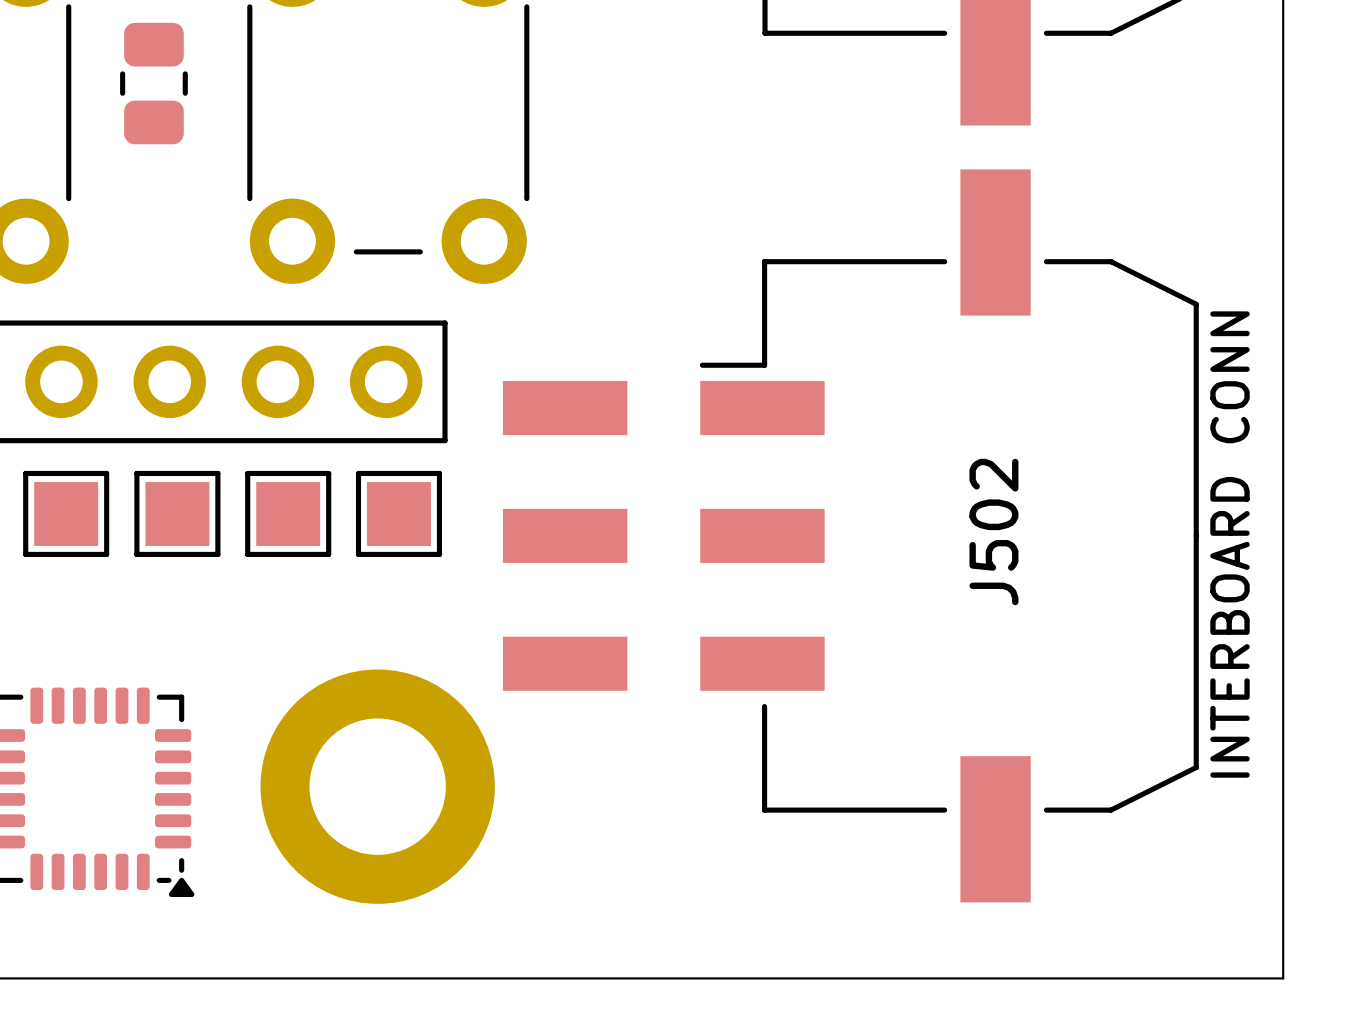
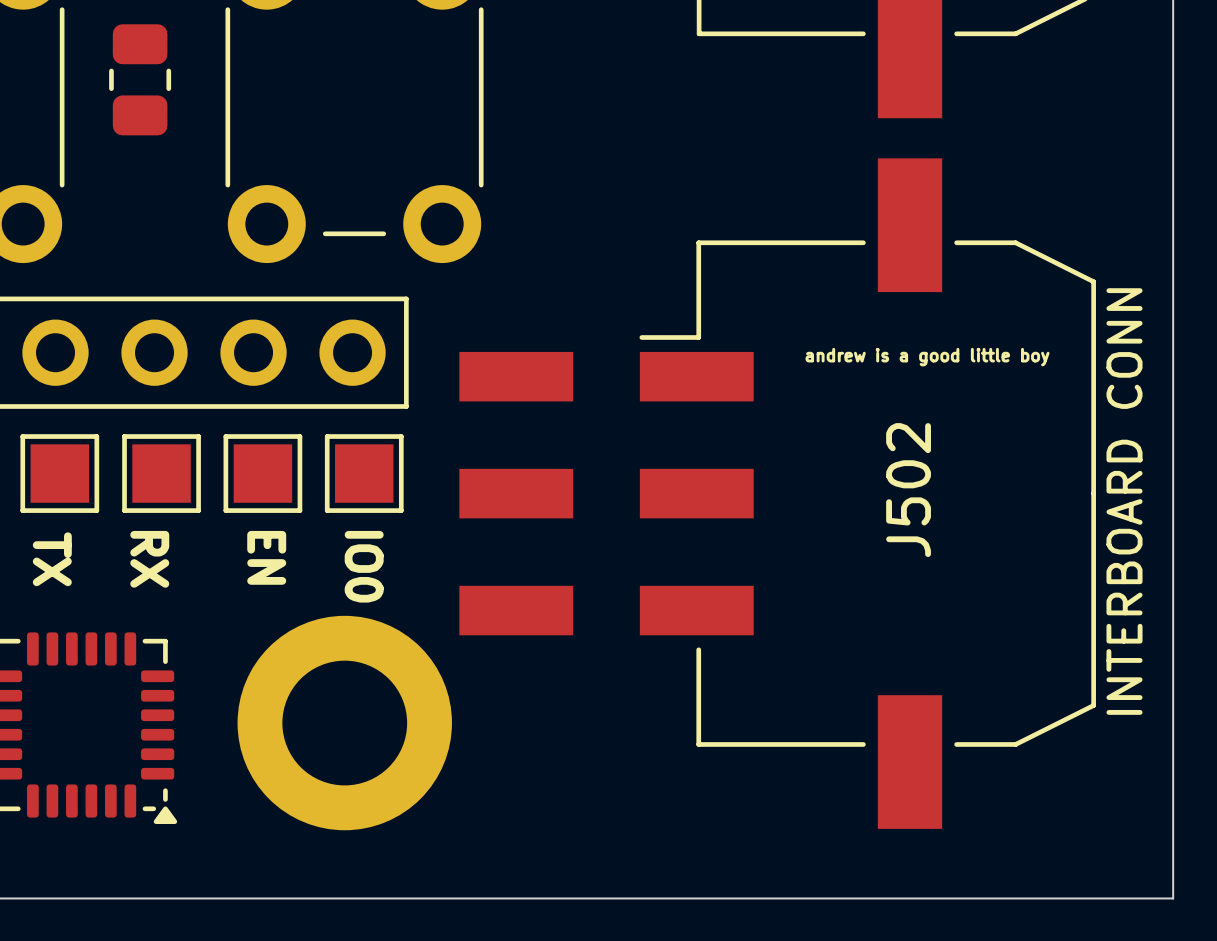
text: none -> andrew is a good little boy (927, 357)
text: none -> EN (266, 557)
text: none -> TX (52, 559)
text: none -> RX (149, 559)
text: none -> IO0 (364, 566)

